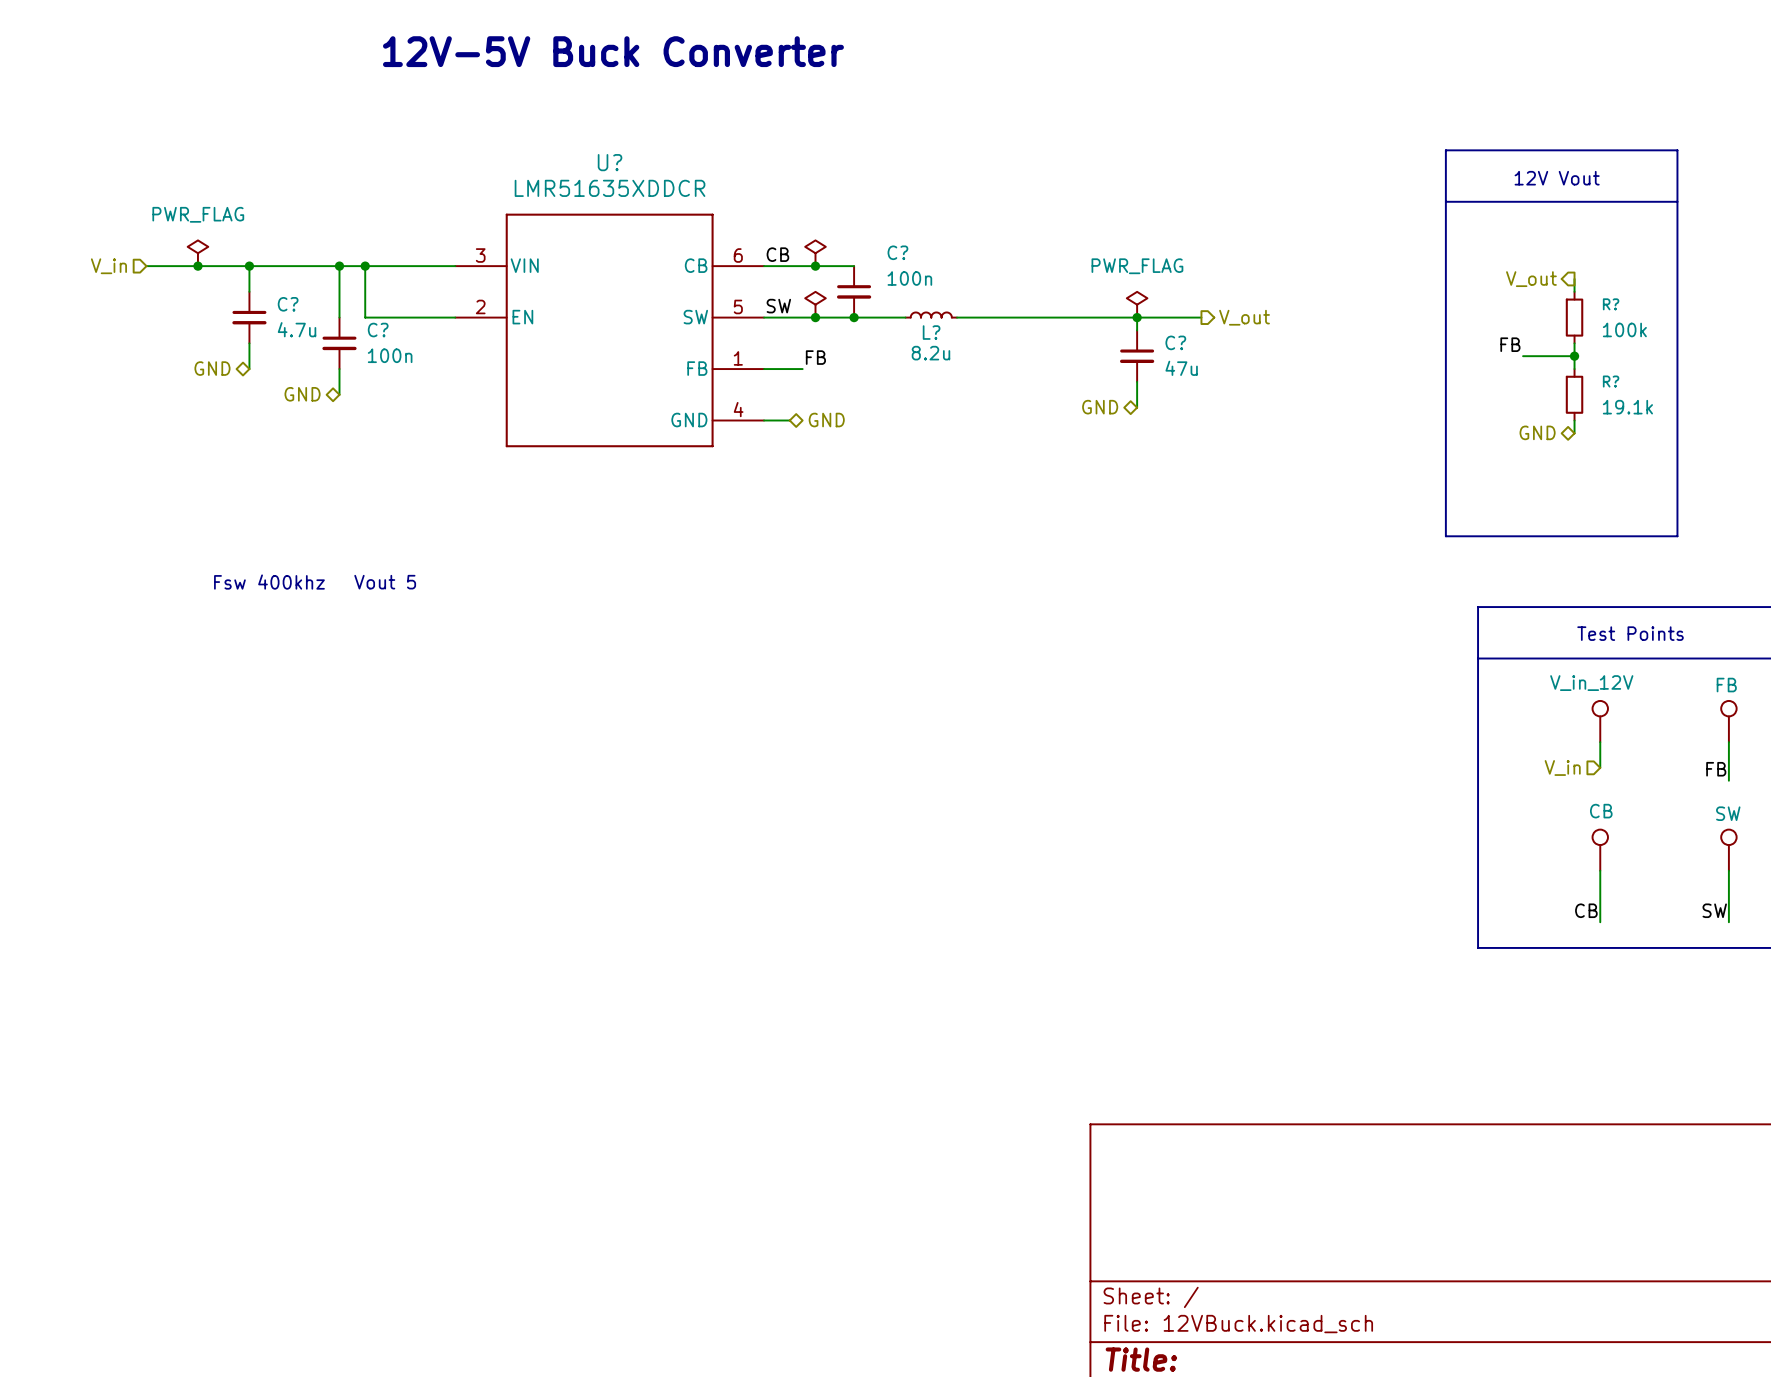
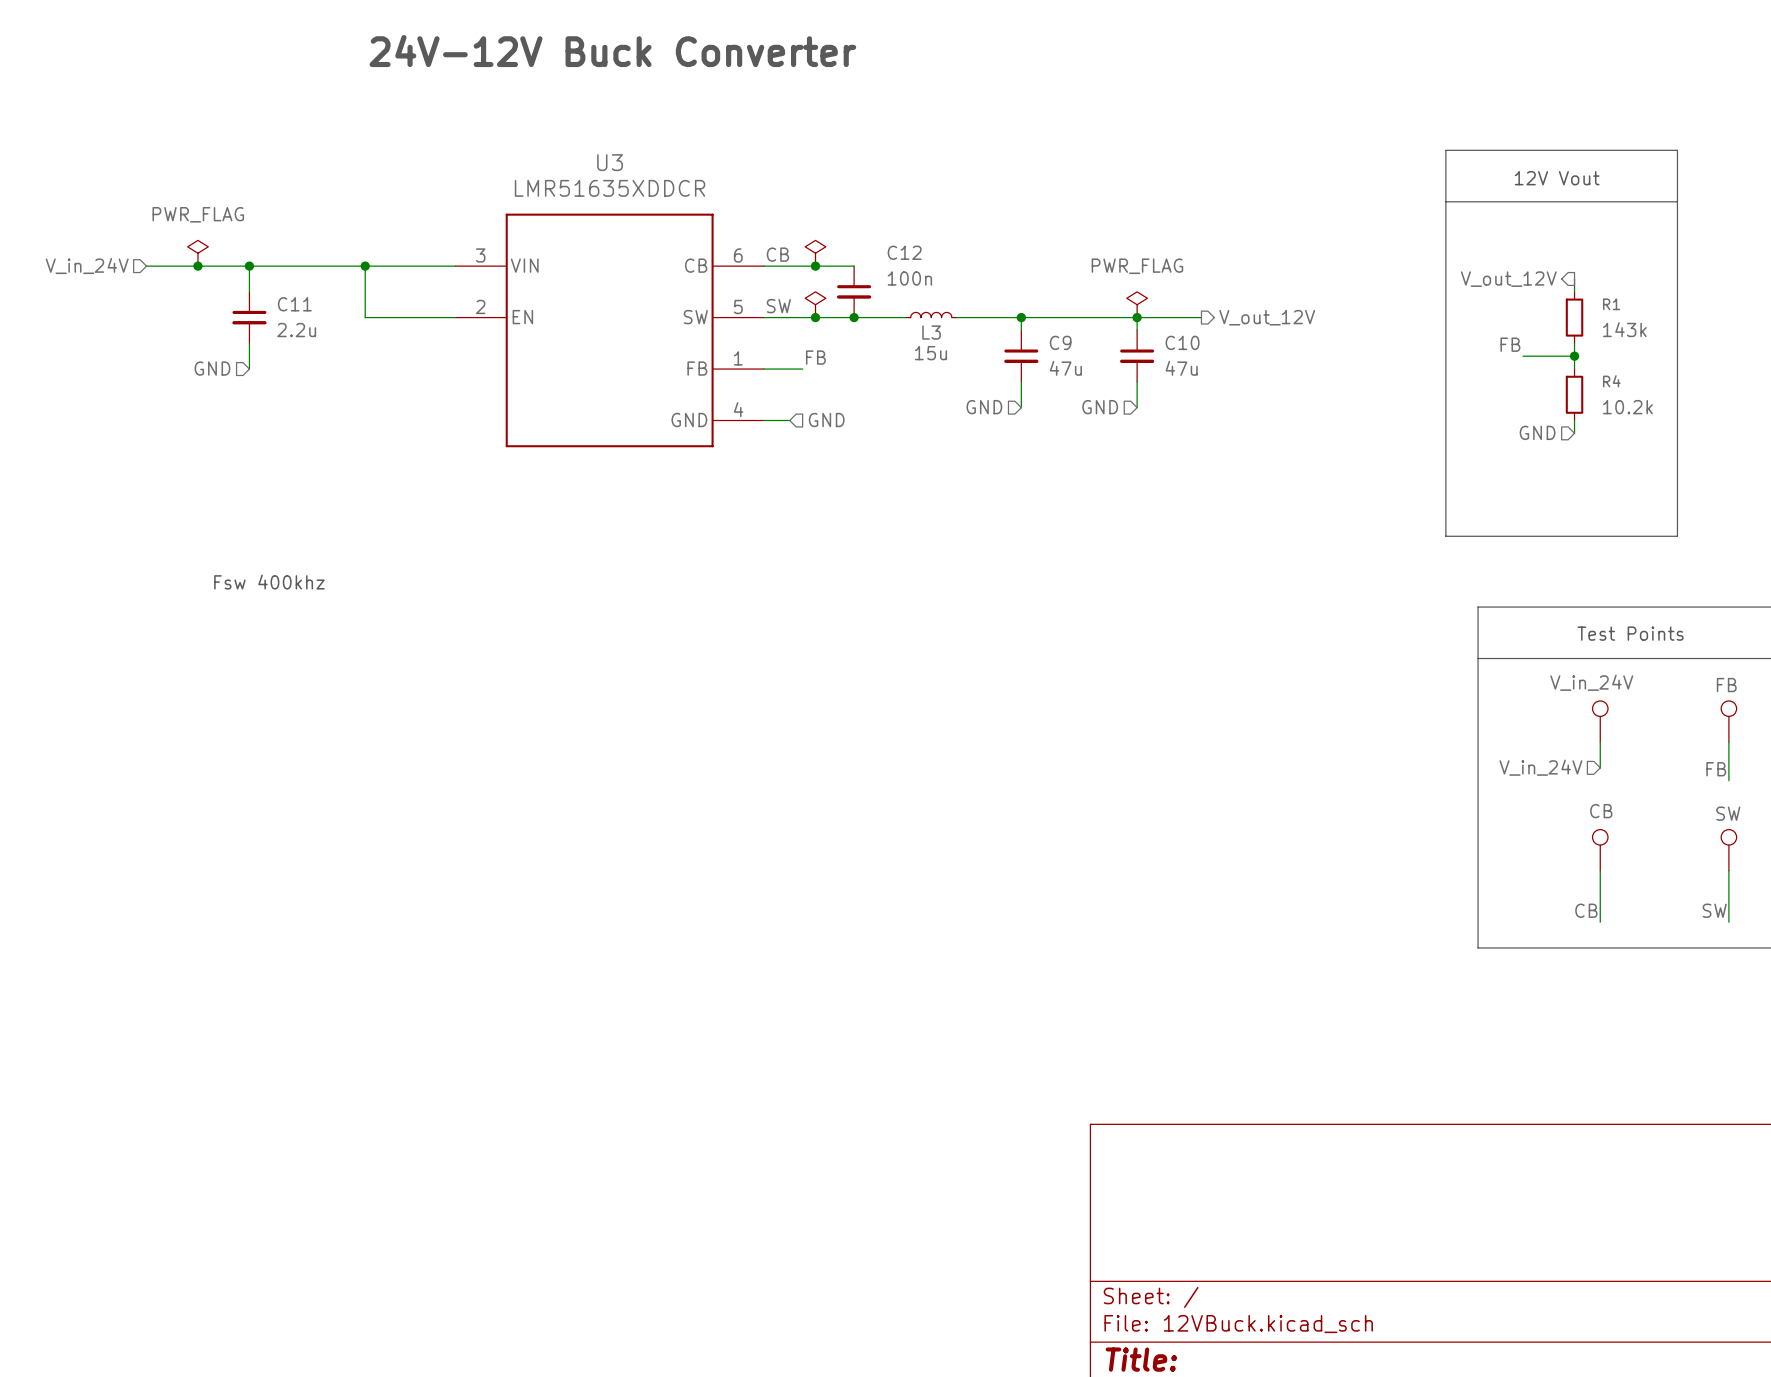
text: 12V-5V Buck Converter (613, 51) -> 24V-12V Buck Converter (612, 51)
U? name: U? (610, 162) -> U3 (610, 162)
C? name: C? (897, 252) -> C12 (904, 252)
hierarchical label: V_in (108, 266) -> V_in_24V (87, 265)
wire: (339, 266) (339, 317) -> none
junction: (339, 266) -> none
hierarchical label: V_out (1531, 279) -> V_out_12V (1508, 279)
C? name: C? (288, 304) -> C11 (294, 304)
R? name: R? (1611, 304) -> R1 (1611, 304)
wire: none -> (1021, 317) (1021, 330)
junction: none -> (1021, 317)
hierarchical label: V_out (1244, 317) -> V_out_12V (1267, 317)
C? value: 4.7u (297, 329) -> 2.2u (296, 330)
R? value: 100k (1624, 329) -> 143k (1624, 329)
L? name: L? (931, 332) -> L3 (931, 332)
C? name: C? (1175, 342) -> C10 (1182, 342)
C?: 100n (339, 343) -> none
L? value: 8.2u (930, 353) -> 15u (930, 353)
C9: none -> 47u (1021, 356)
hierarchical label shape: bidirectional (212, 368) -> input (212, 368)
wire: (339, 369) (339, 394) -> none
wire: none -> (1021, 381) (1021, 407)
R? name: R? (1611, 381) -> R4 (1611, 381)
hierarchical label: GND (302, 394) -> none
hierarchical label: none -> GND (984, 407)
hierarchical label shape: bidirectional (1100, 407) -> input (1100, 407)
R? value: 19.1k (1627, 407) -> 10.2k (1627, 407)
hierarchical label shape: bidirectional (826, 420) -> input (826, 420)
hierarchical label shape: bidirectional (1537, 432) -> input (1537, 432)
text: Vout 5 (385, 582) -> none
part value: V_in_12V (1591, 683) -> V_in_24V (1591, 682)
hierarchical label: V_in (1562, 767) -> V_in_24V (1540, 767)

